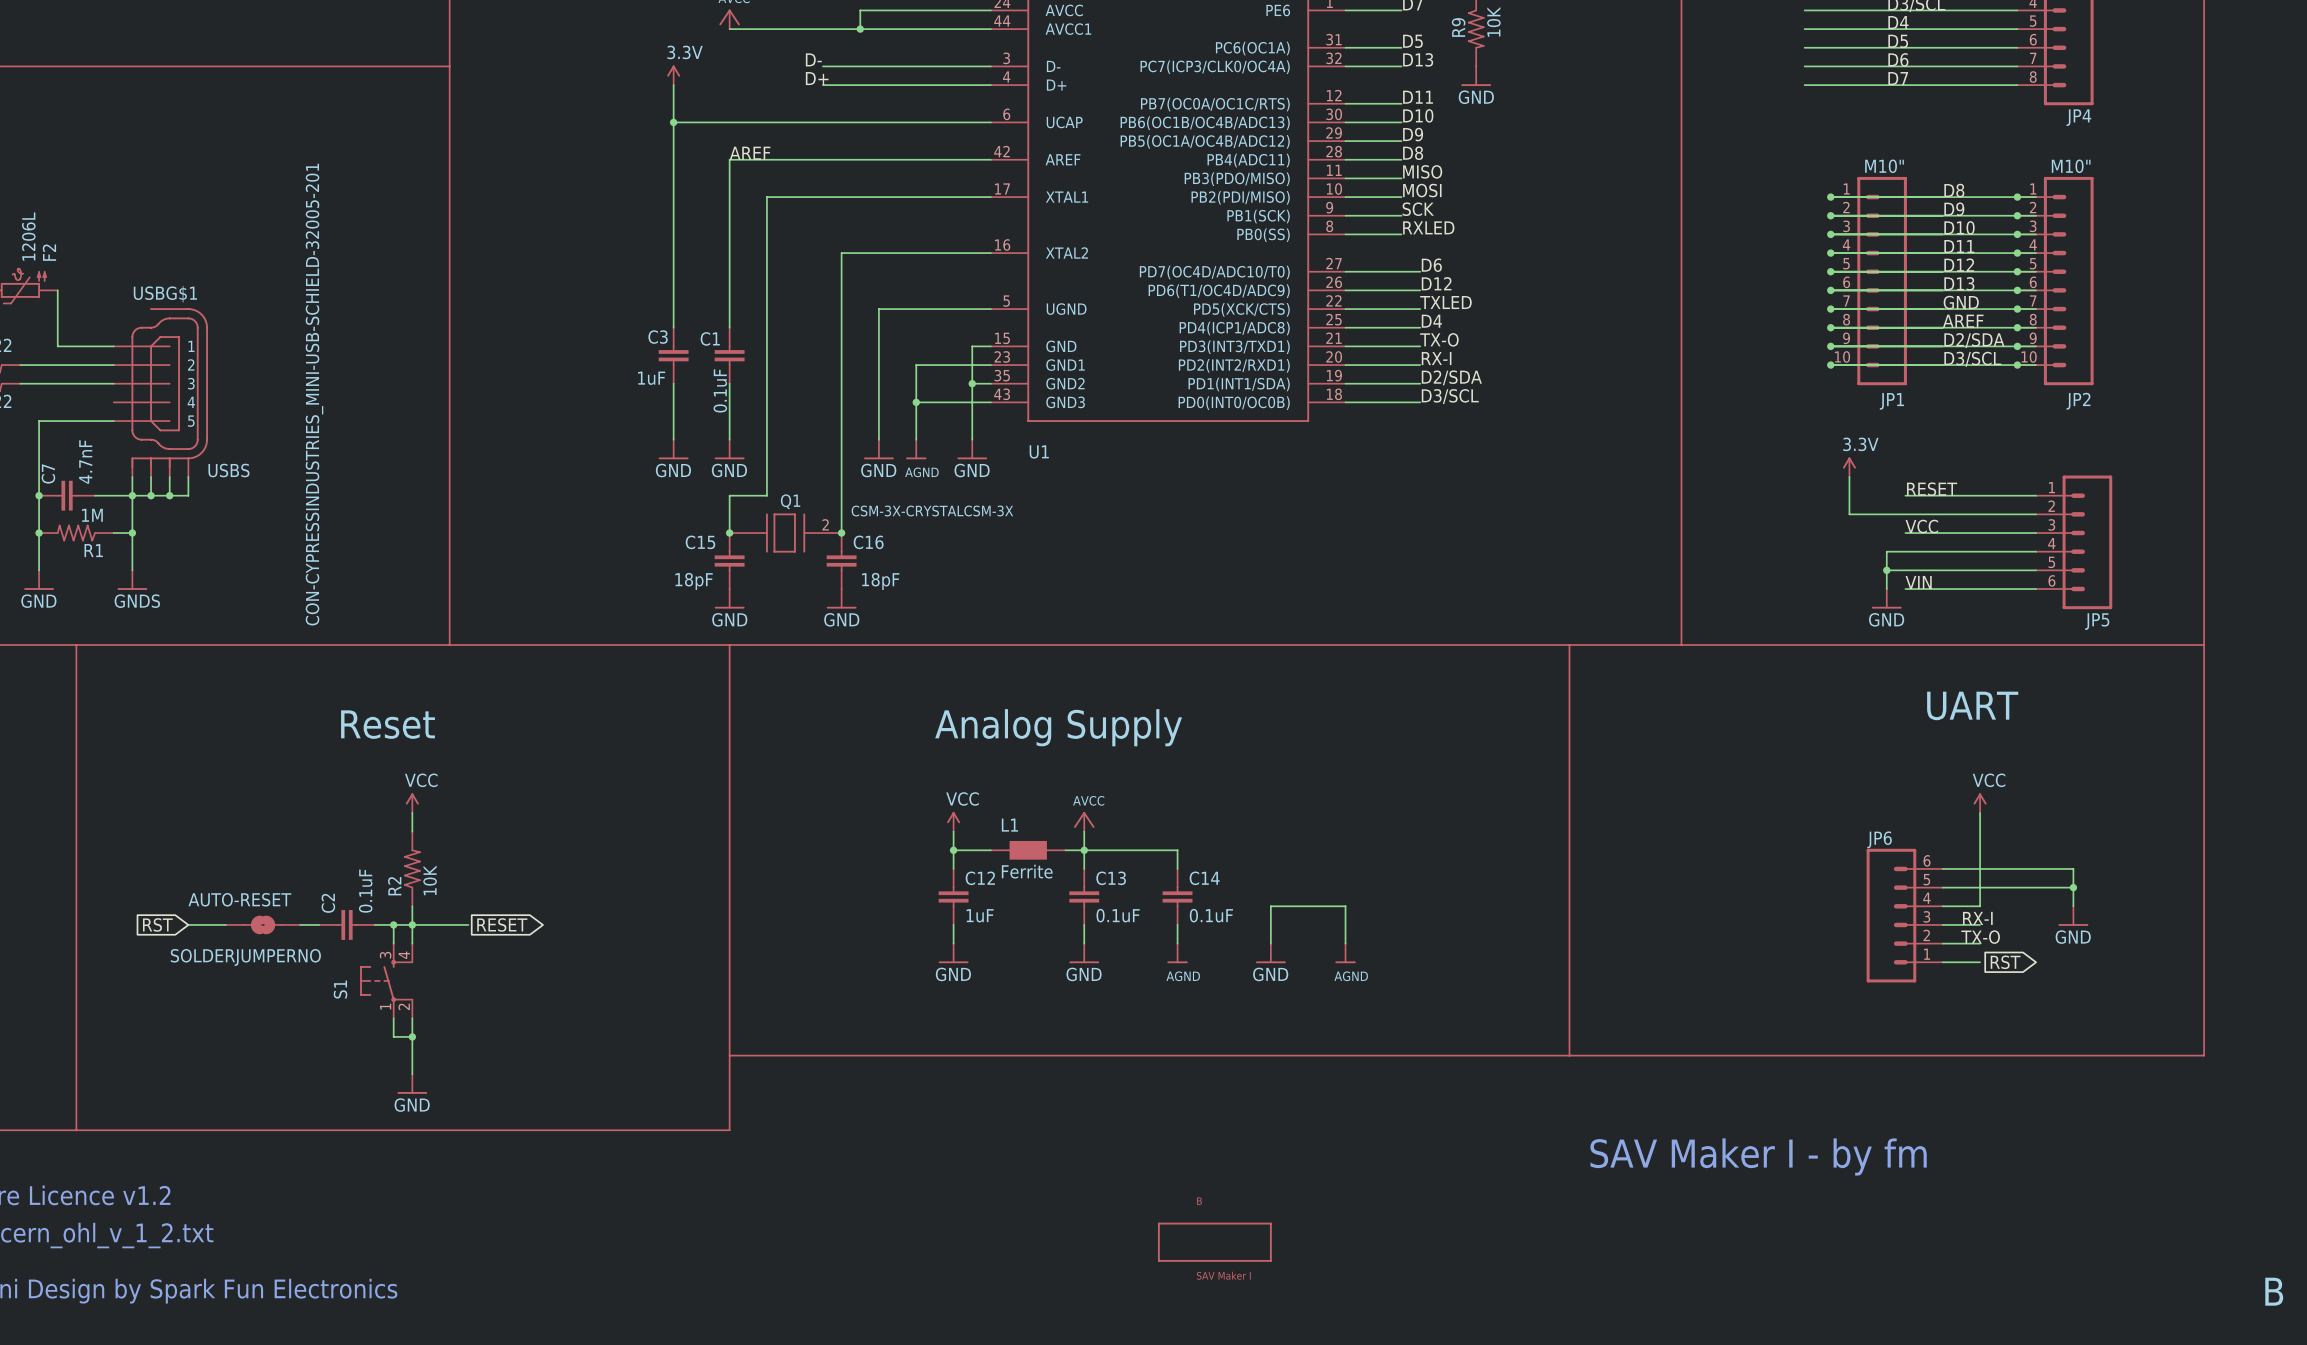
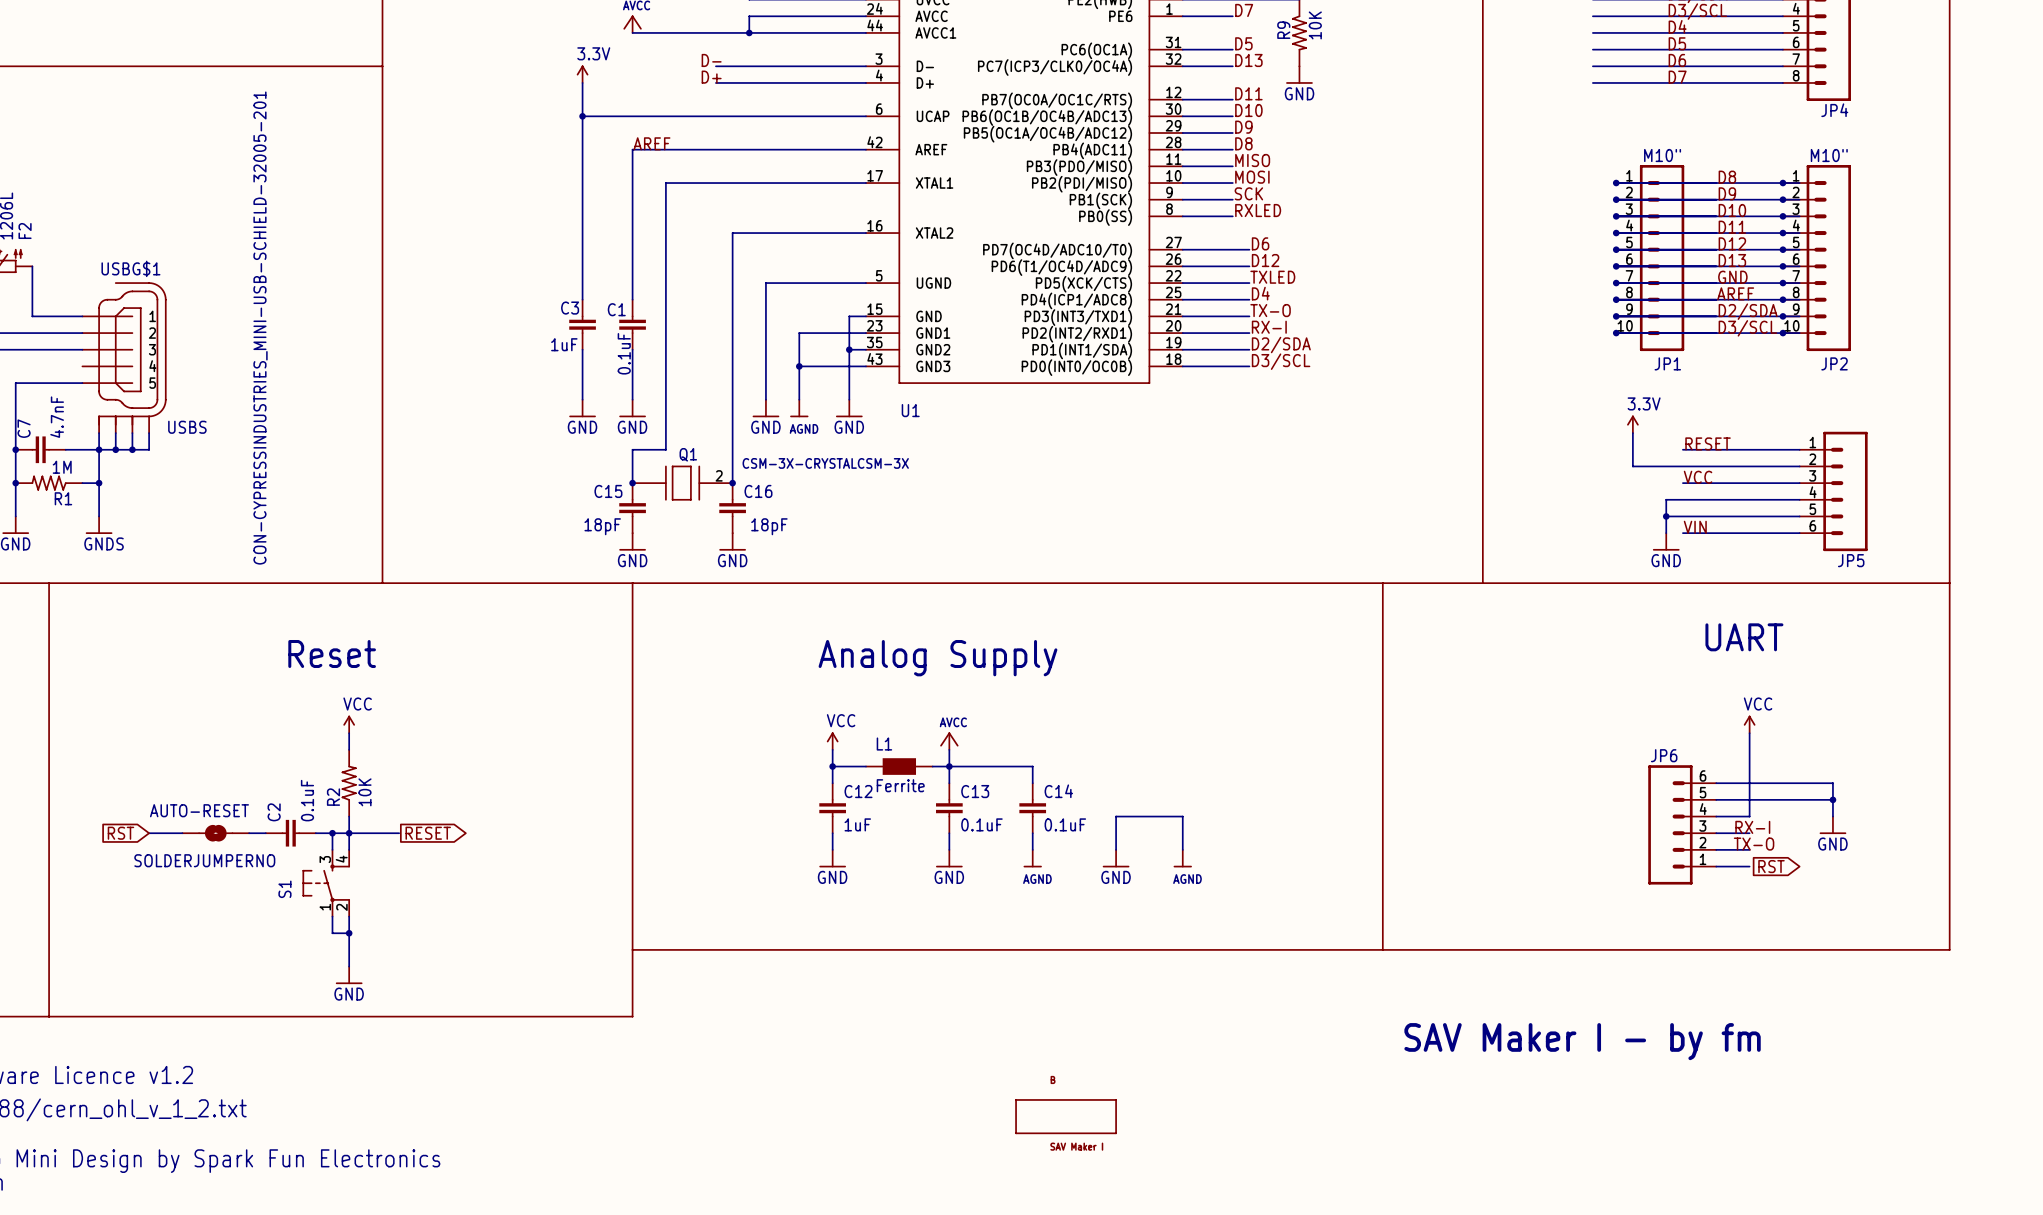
text: B (2274, 1291) -> none

